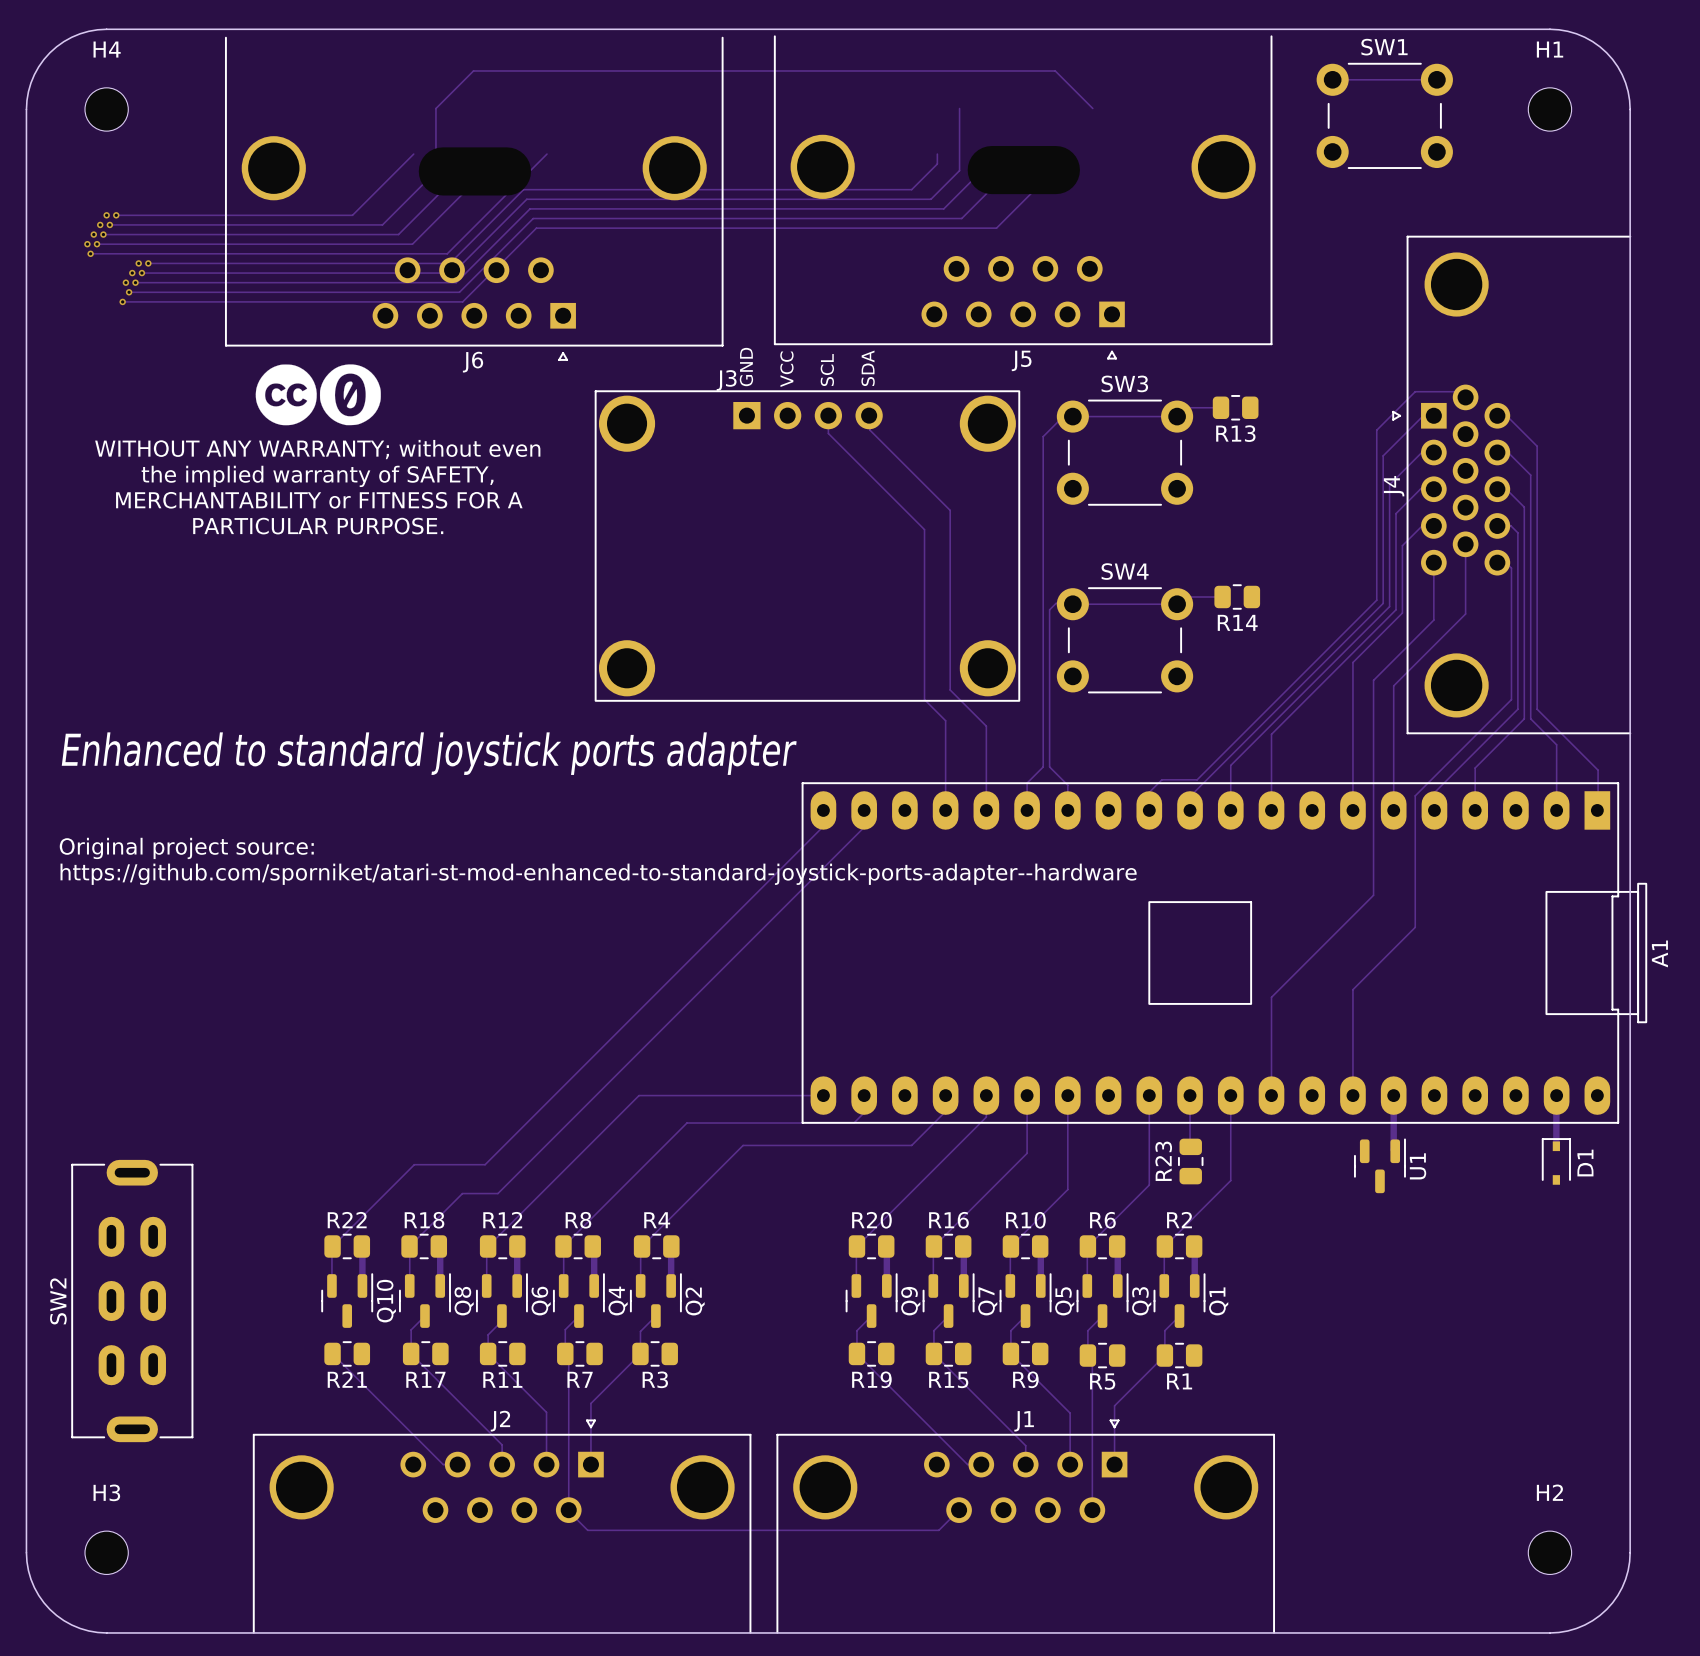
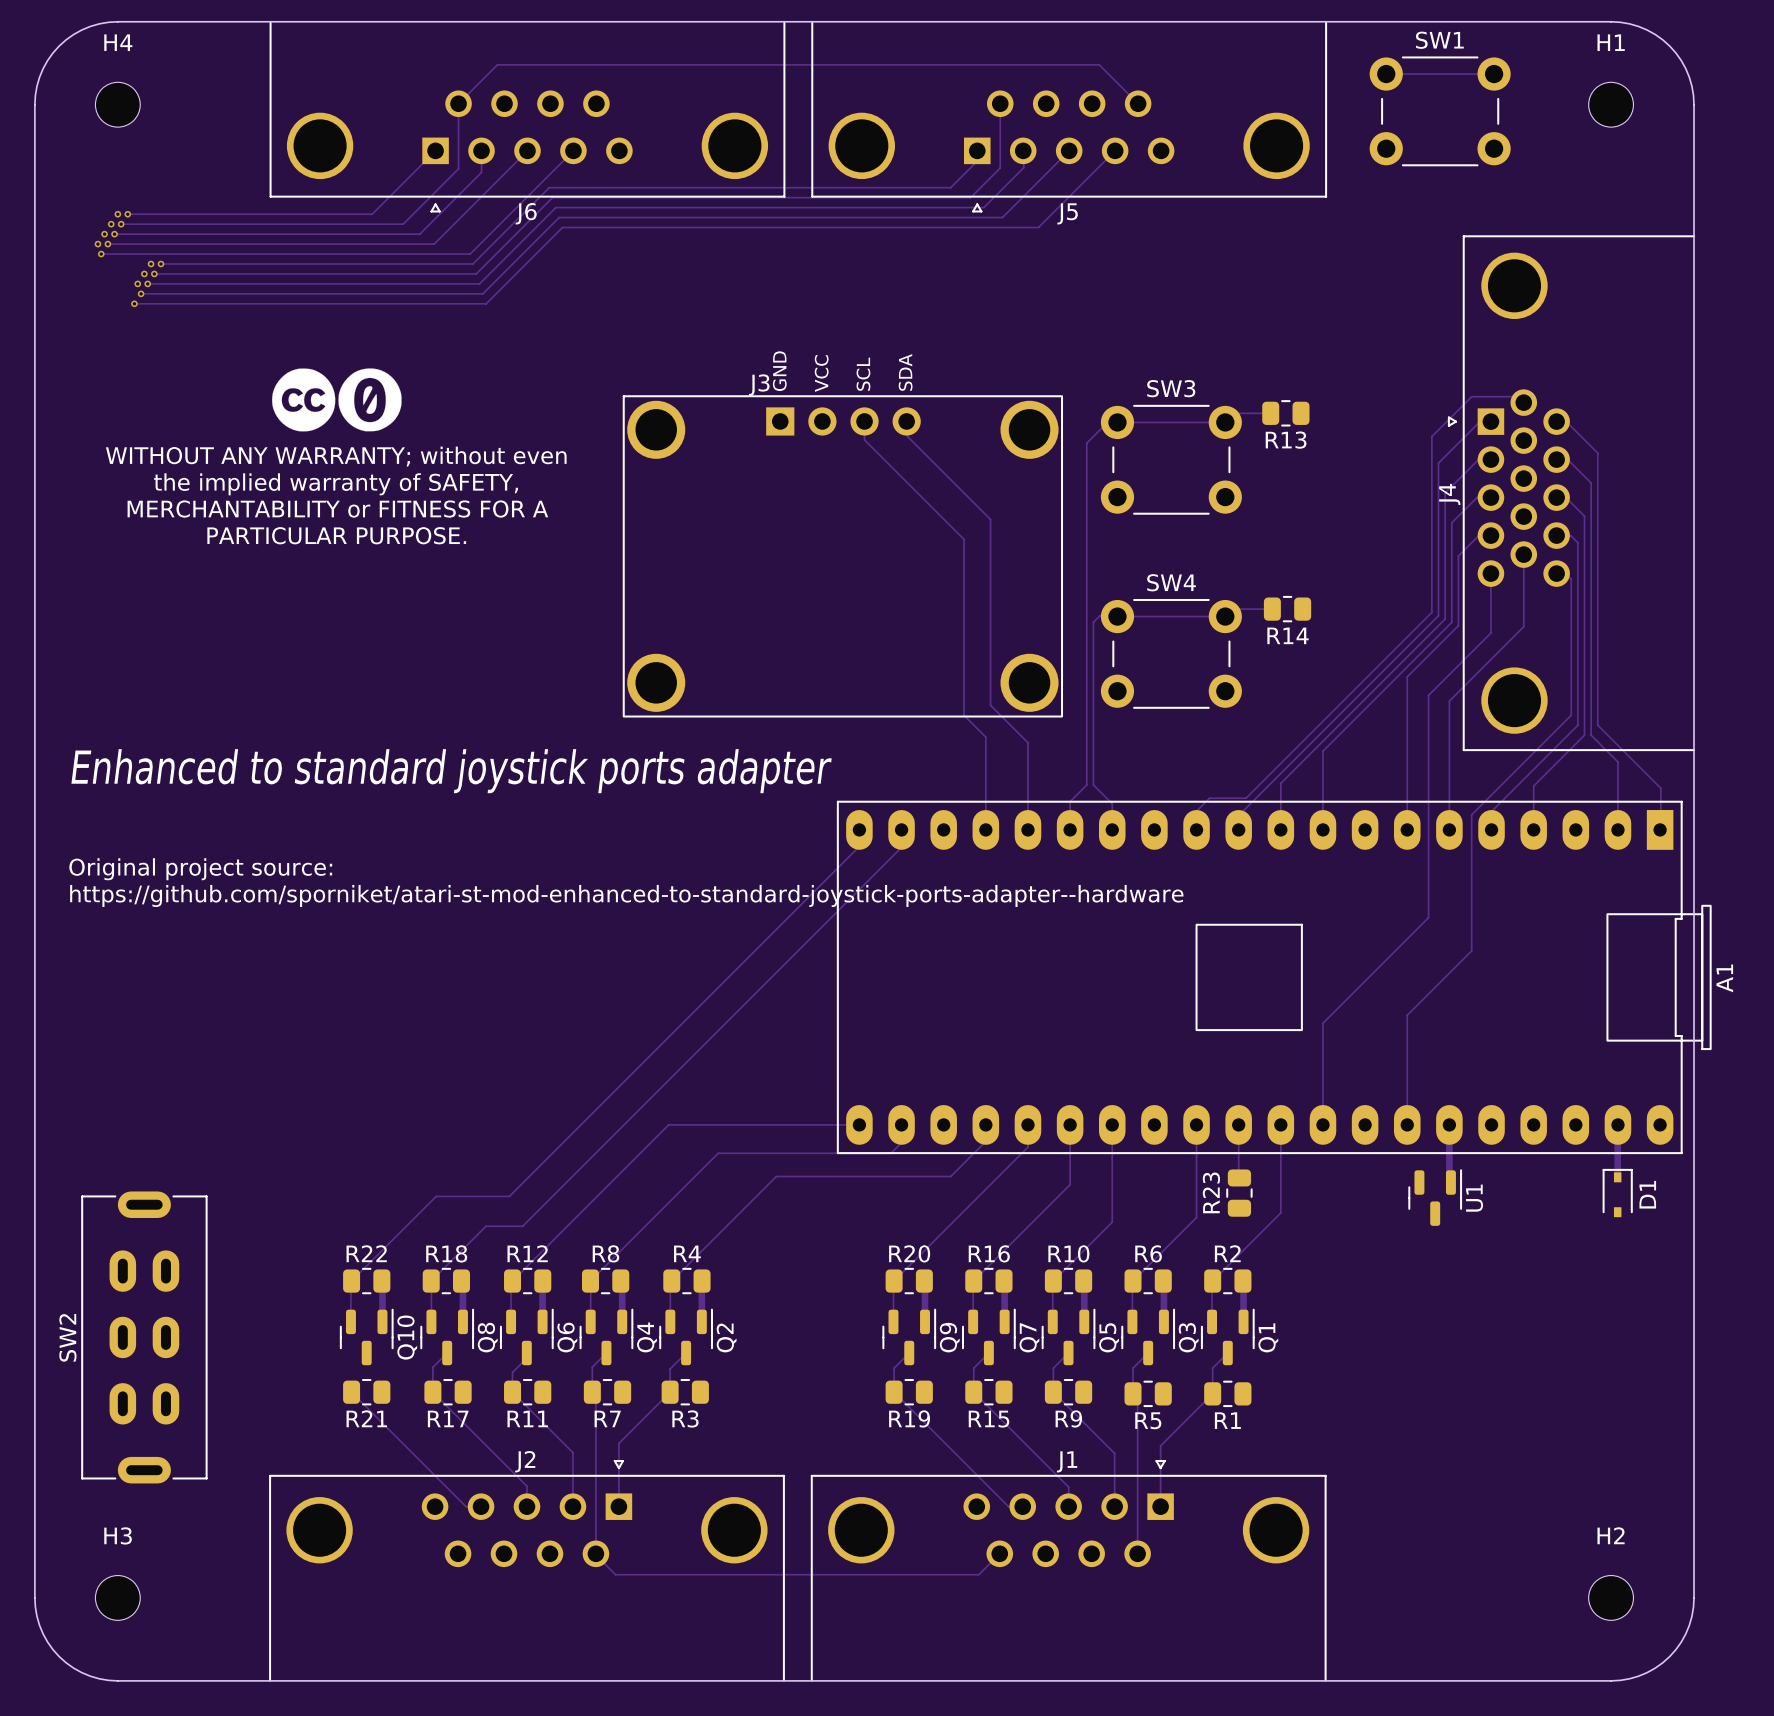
J5 footprint: [773, 35, 1273, 360] -> [811, 21, 1328, 213]
J6 footprint: [224, 36, 724, 361] -> [269, 21, 786, 213]
J5 name position: J5 (1021, 360) -> J5 (1067, 213)
J6 name position: J6 (473, 362) -> J6 (526, 213)

